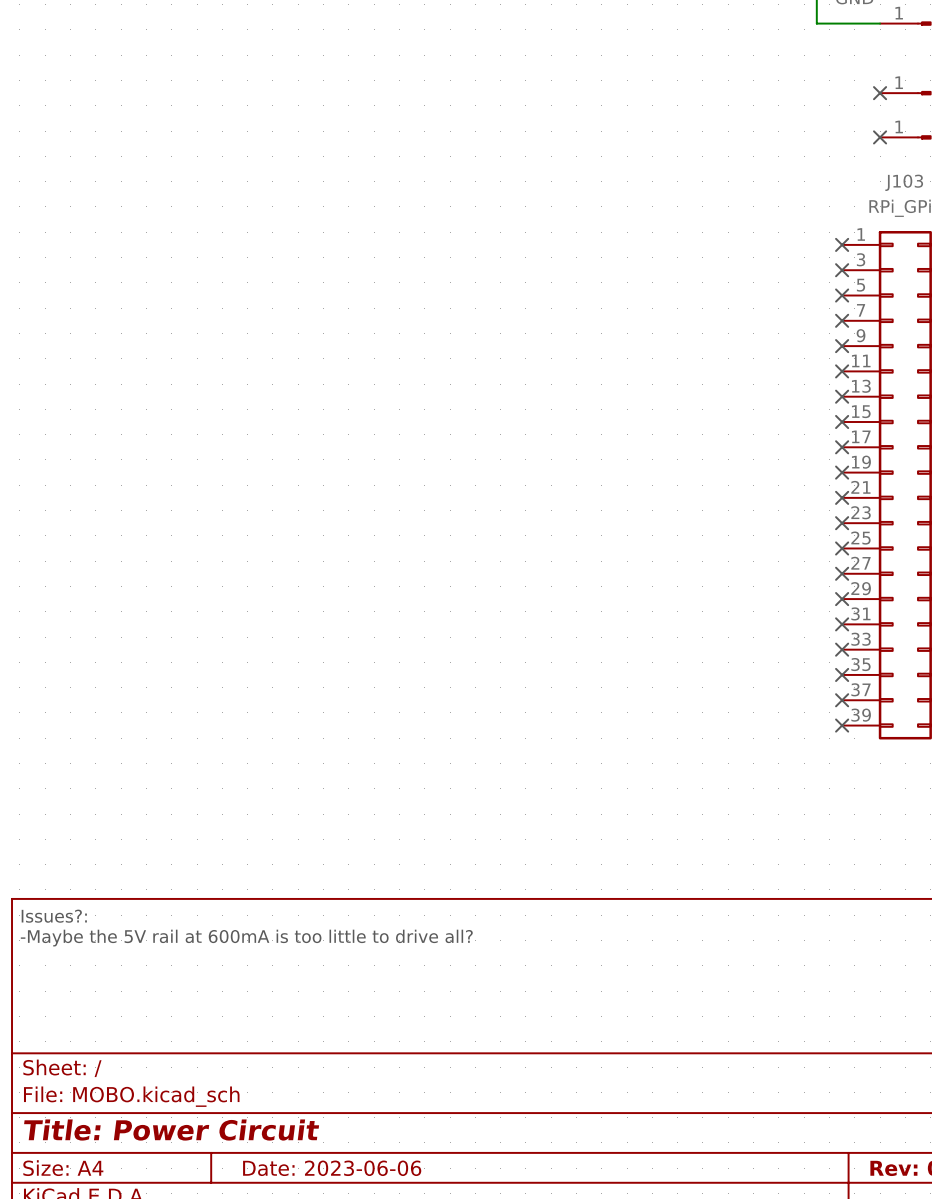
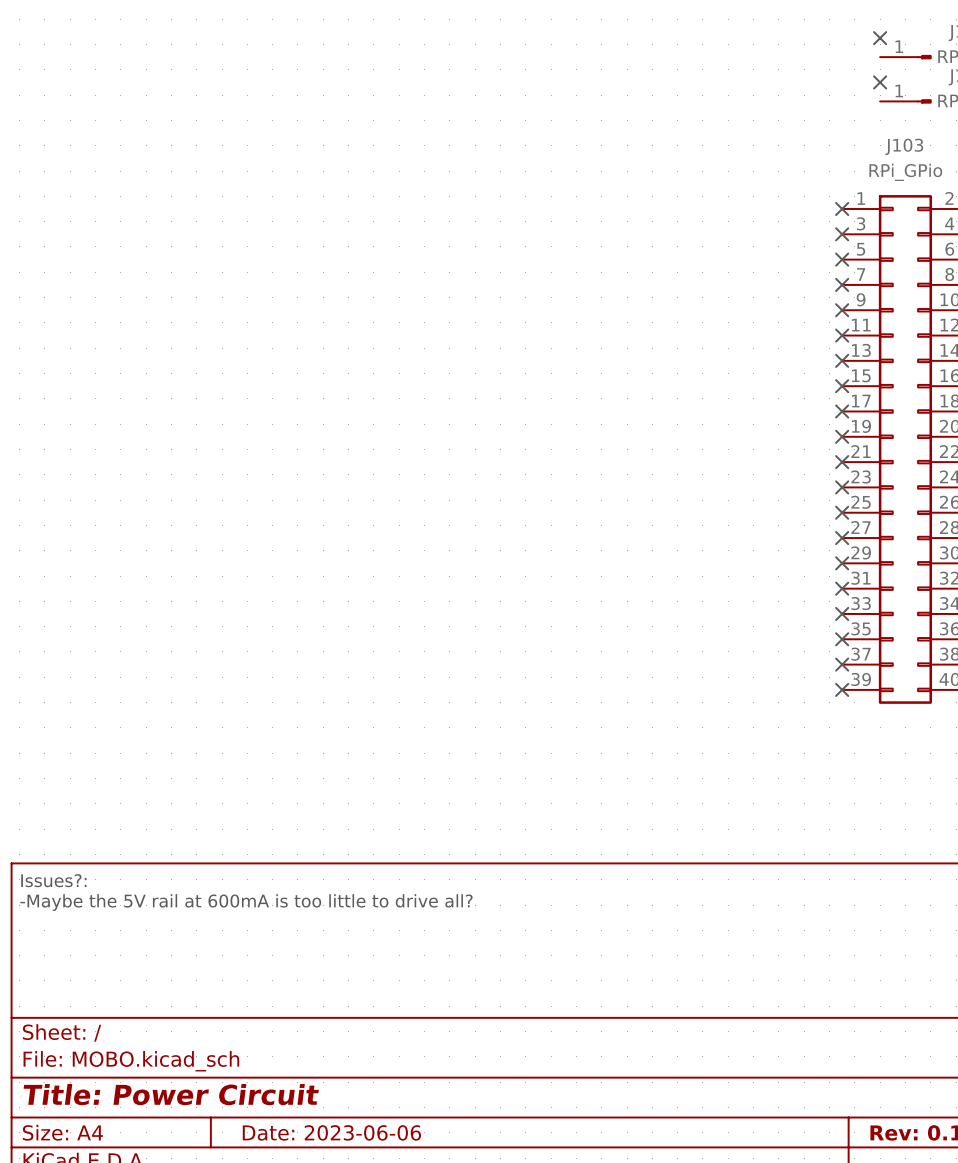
no-connect mark: none -> (880, 38)
no-connect mark: (880, 93) -> none
no-connect mark: none -> (880, 82)
no-connect mark: (880, 137) -> none

